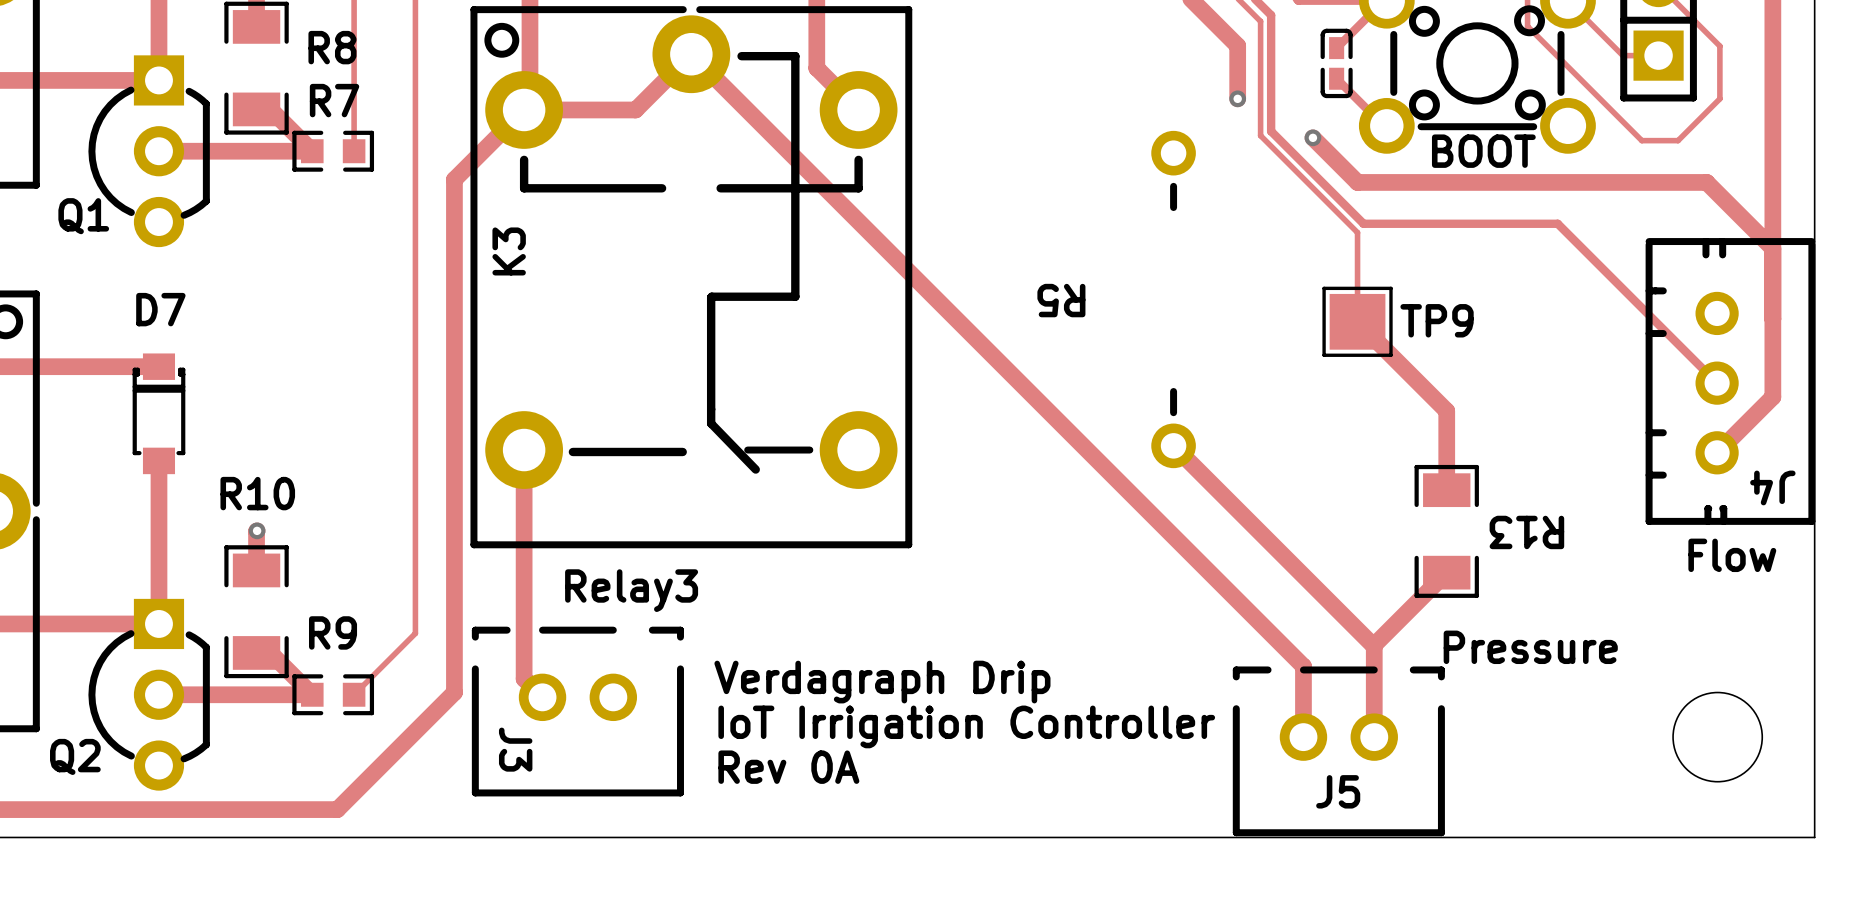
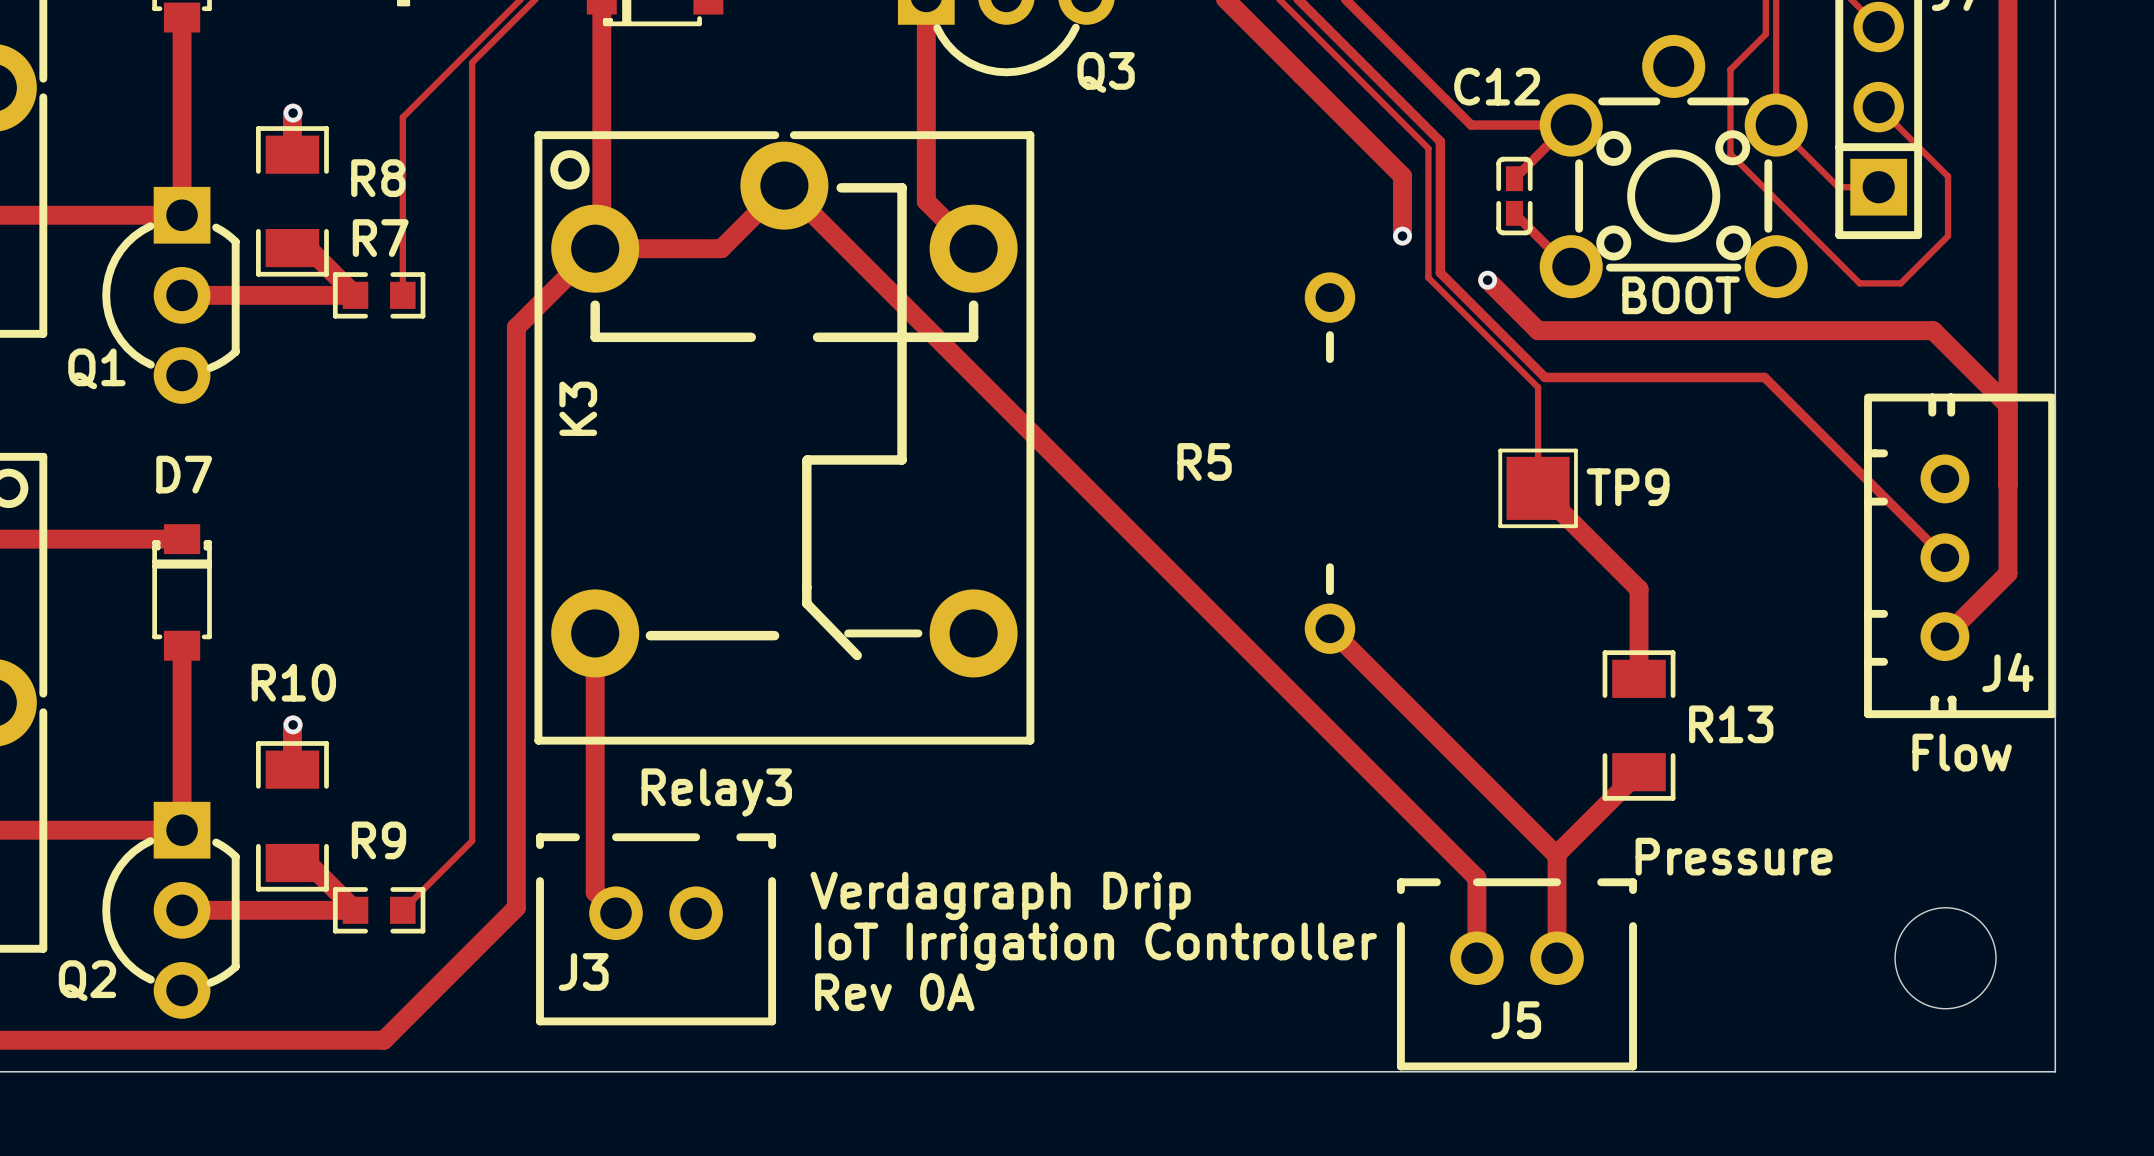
R5 name rotation: 0° (1061, 300) -> 180° (1204, 461)
J4 name rotation: 0° (1772, 487) -> 180° (2007, 672)
R13 name rotation: 0° (1526, 532) -> 180° (1731, 724)
J3 name rotation: 0° (515, 749) -> 90° counterclockwise (583, 971)

